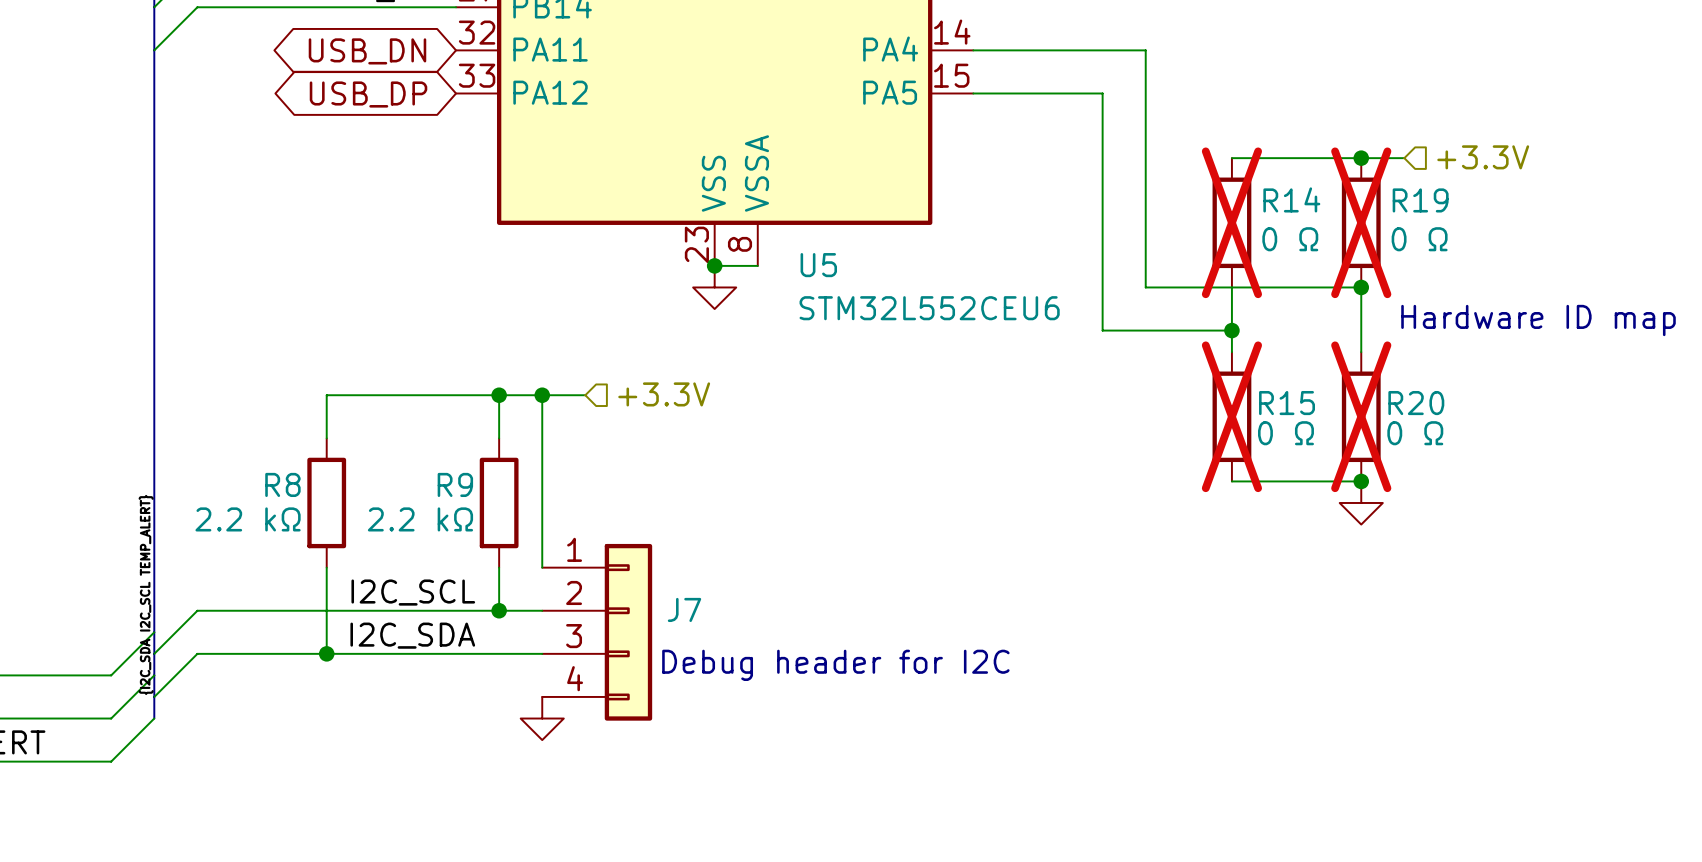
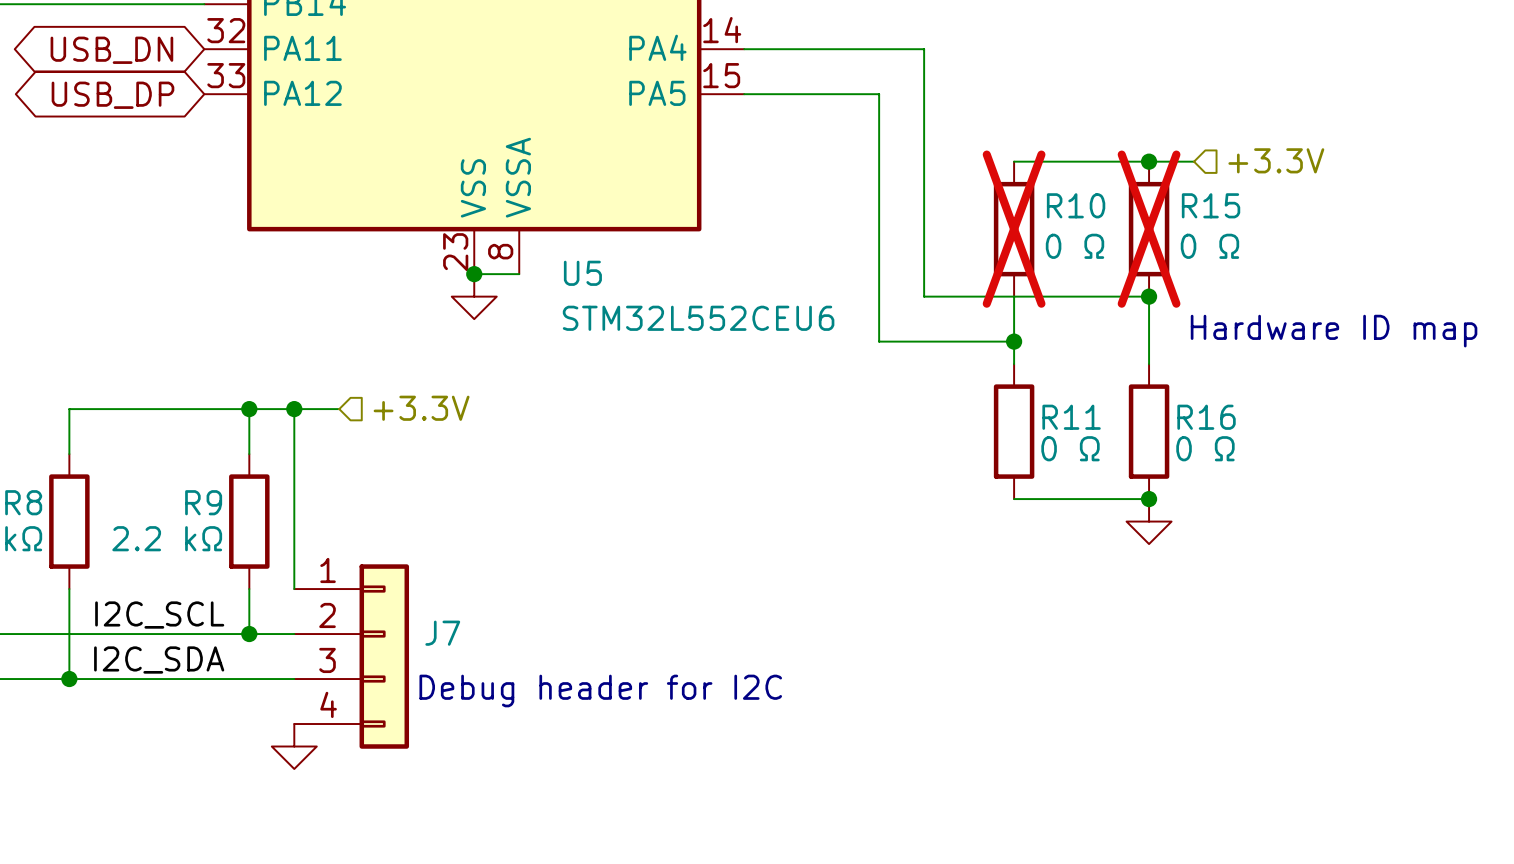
R14 name: R14 (1291, 199) -> R10 (1076, 205)
R19 name: R19 (1420, 200) -> R15 (1211, 205)
R15 name: R15 (1287, 403) -> R11 (1071, 417)
R20 name: R20 (1416, 403) -> R16 (1206, 417)
R15 do-not-place cross: (1231, 416) -> none
R20 do-not-place cross: (1361, 416) -> none

